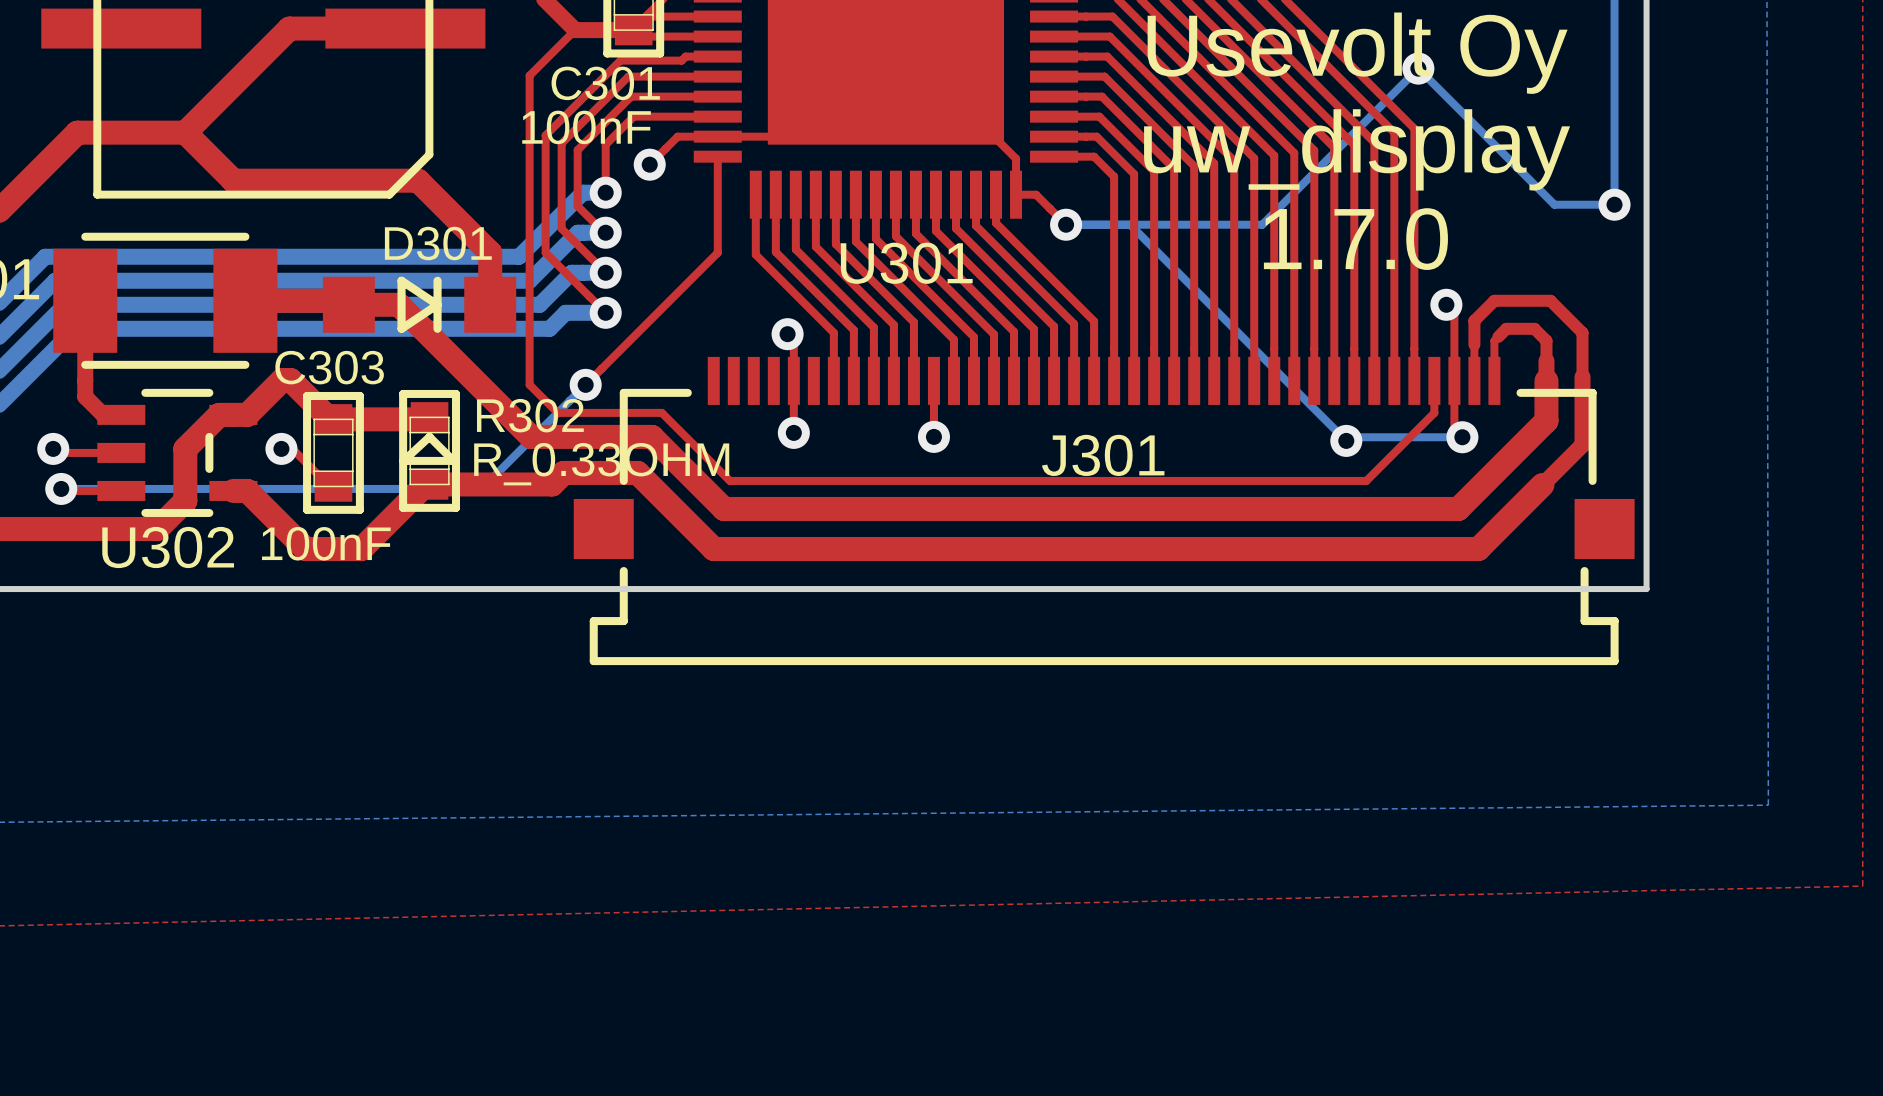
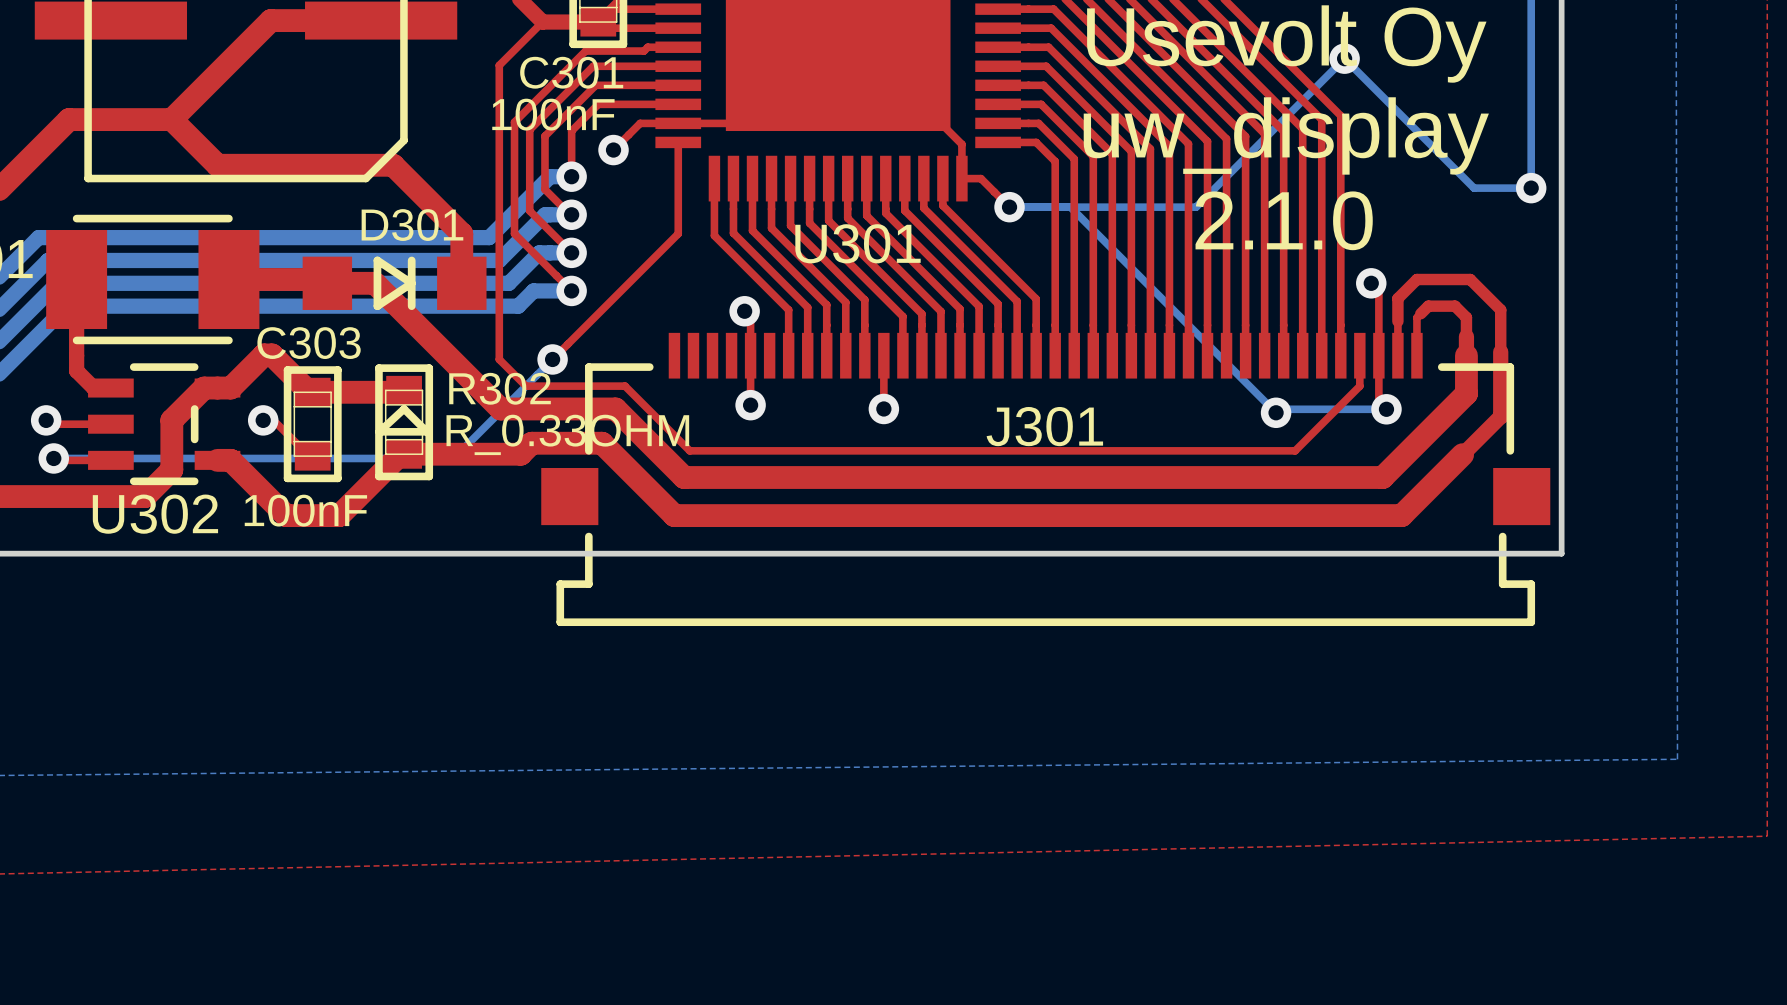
text: 1.7.0 (1355, 239) -> 2.1.0 (1284, 220)

